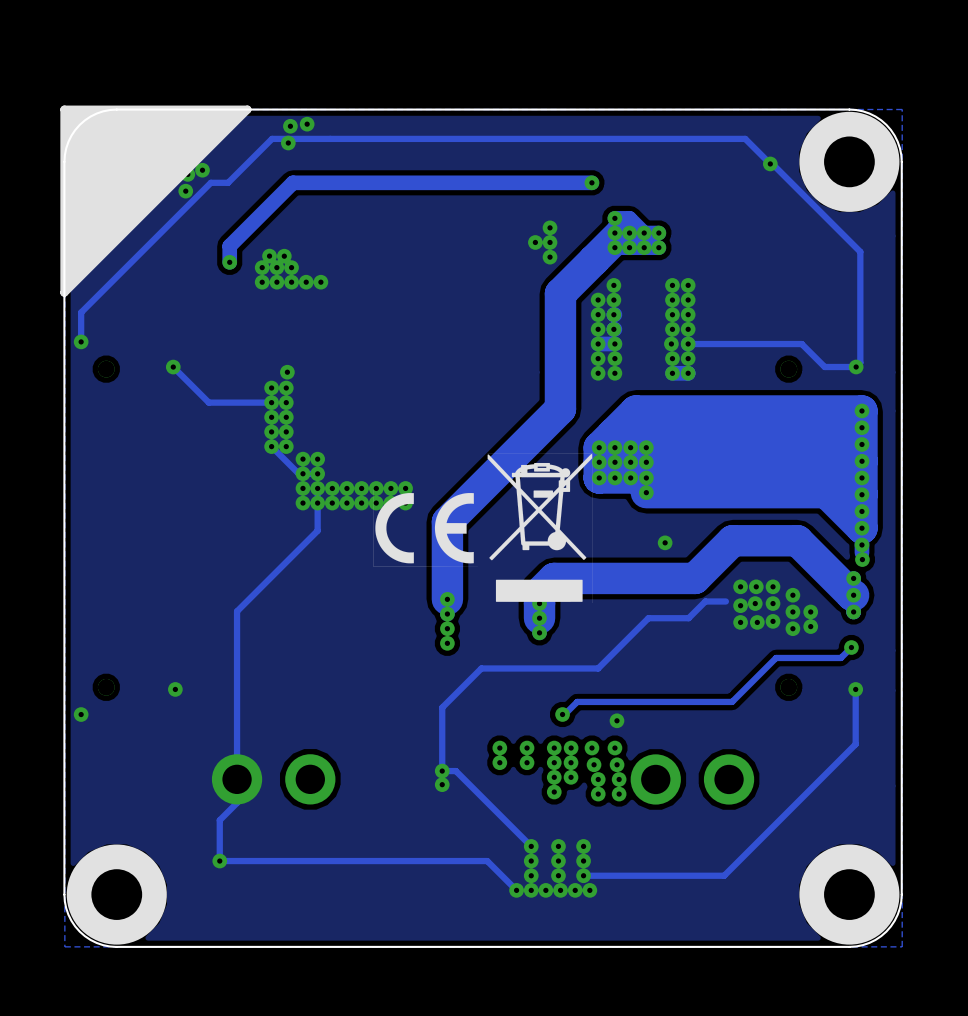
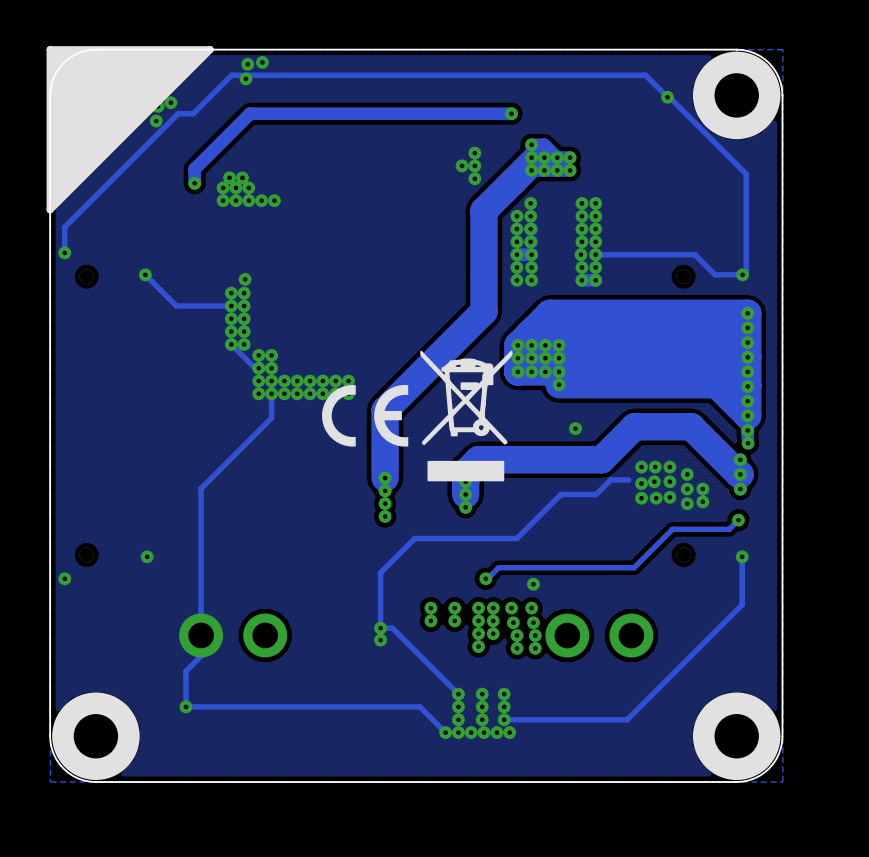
drawing shape: [487, 453, 593, 603] -> [420, 350, 513, 482]
drawing shape: [373, 489, 478, 567] -> [322, 384, 409, 447]

